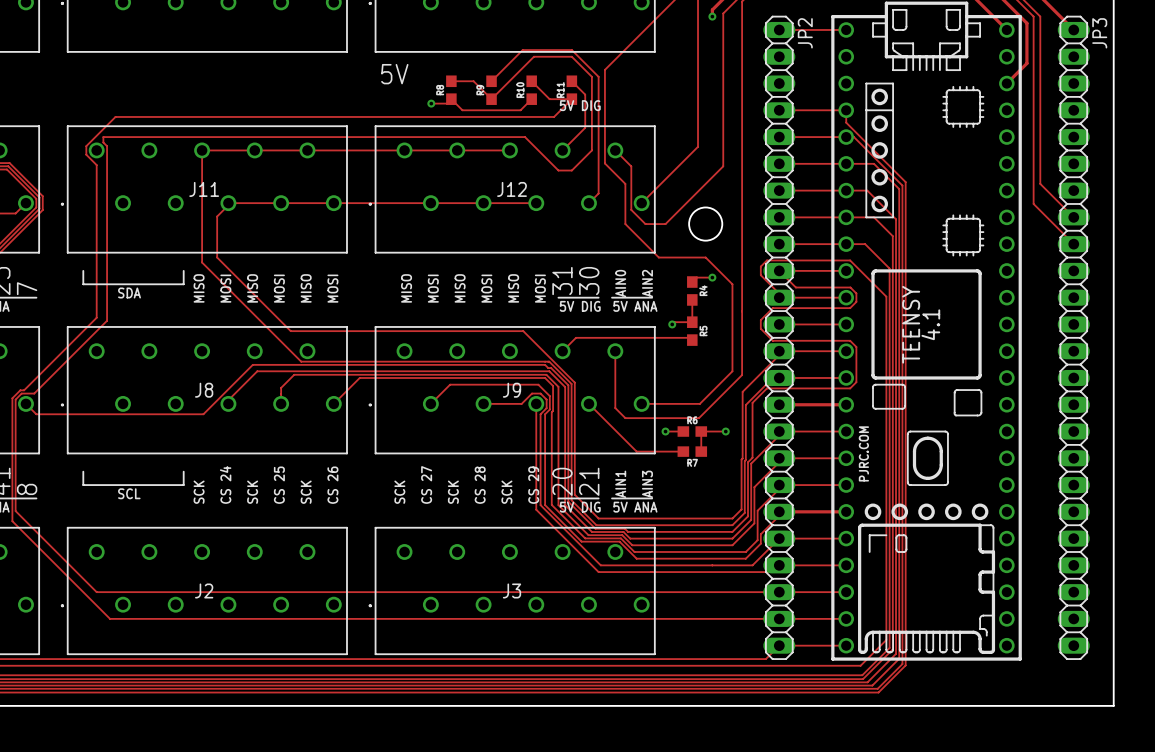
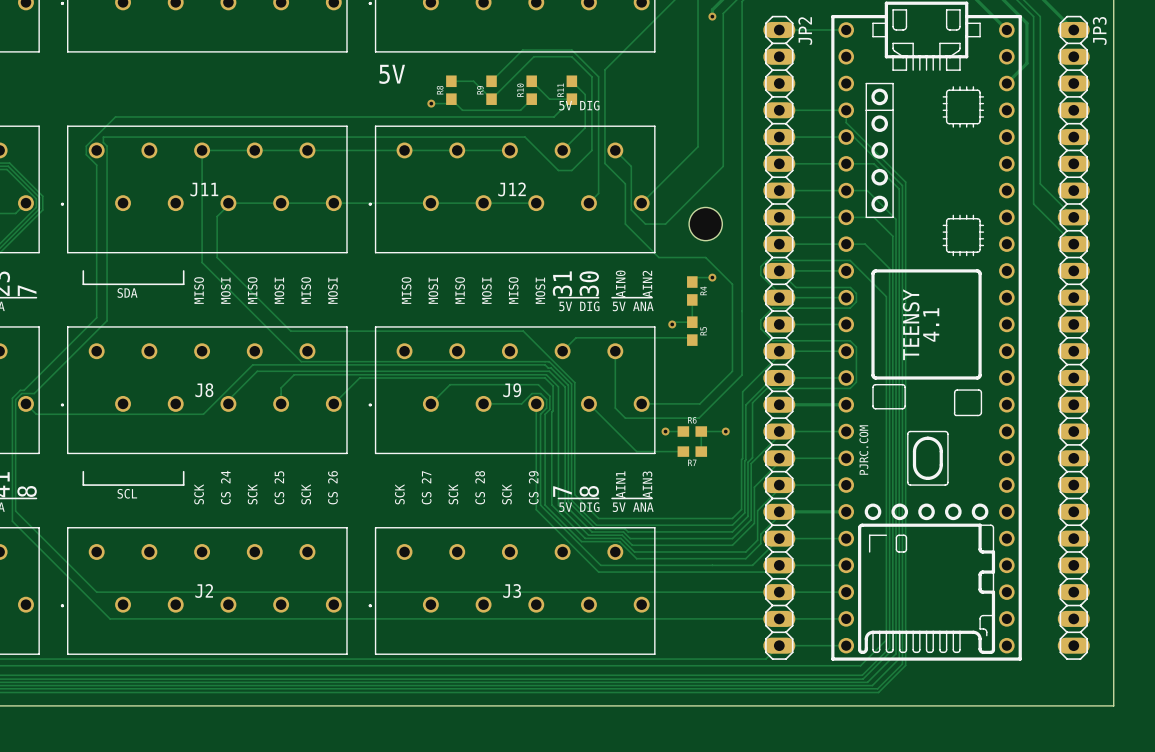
text: 20 (562, 481) -> 7 (562, 491)
text: 21 (589, 481) -> 8 (589, 491)

